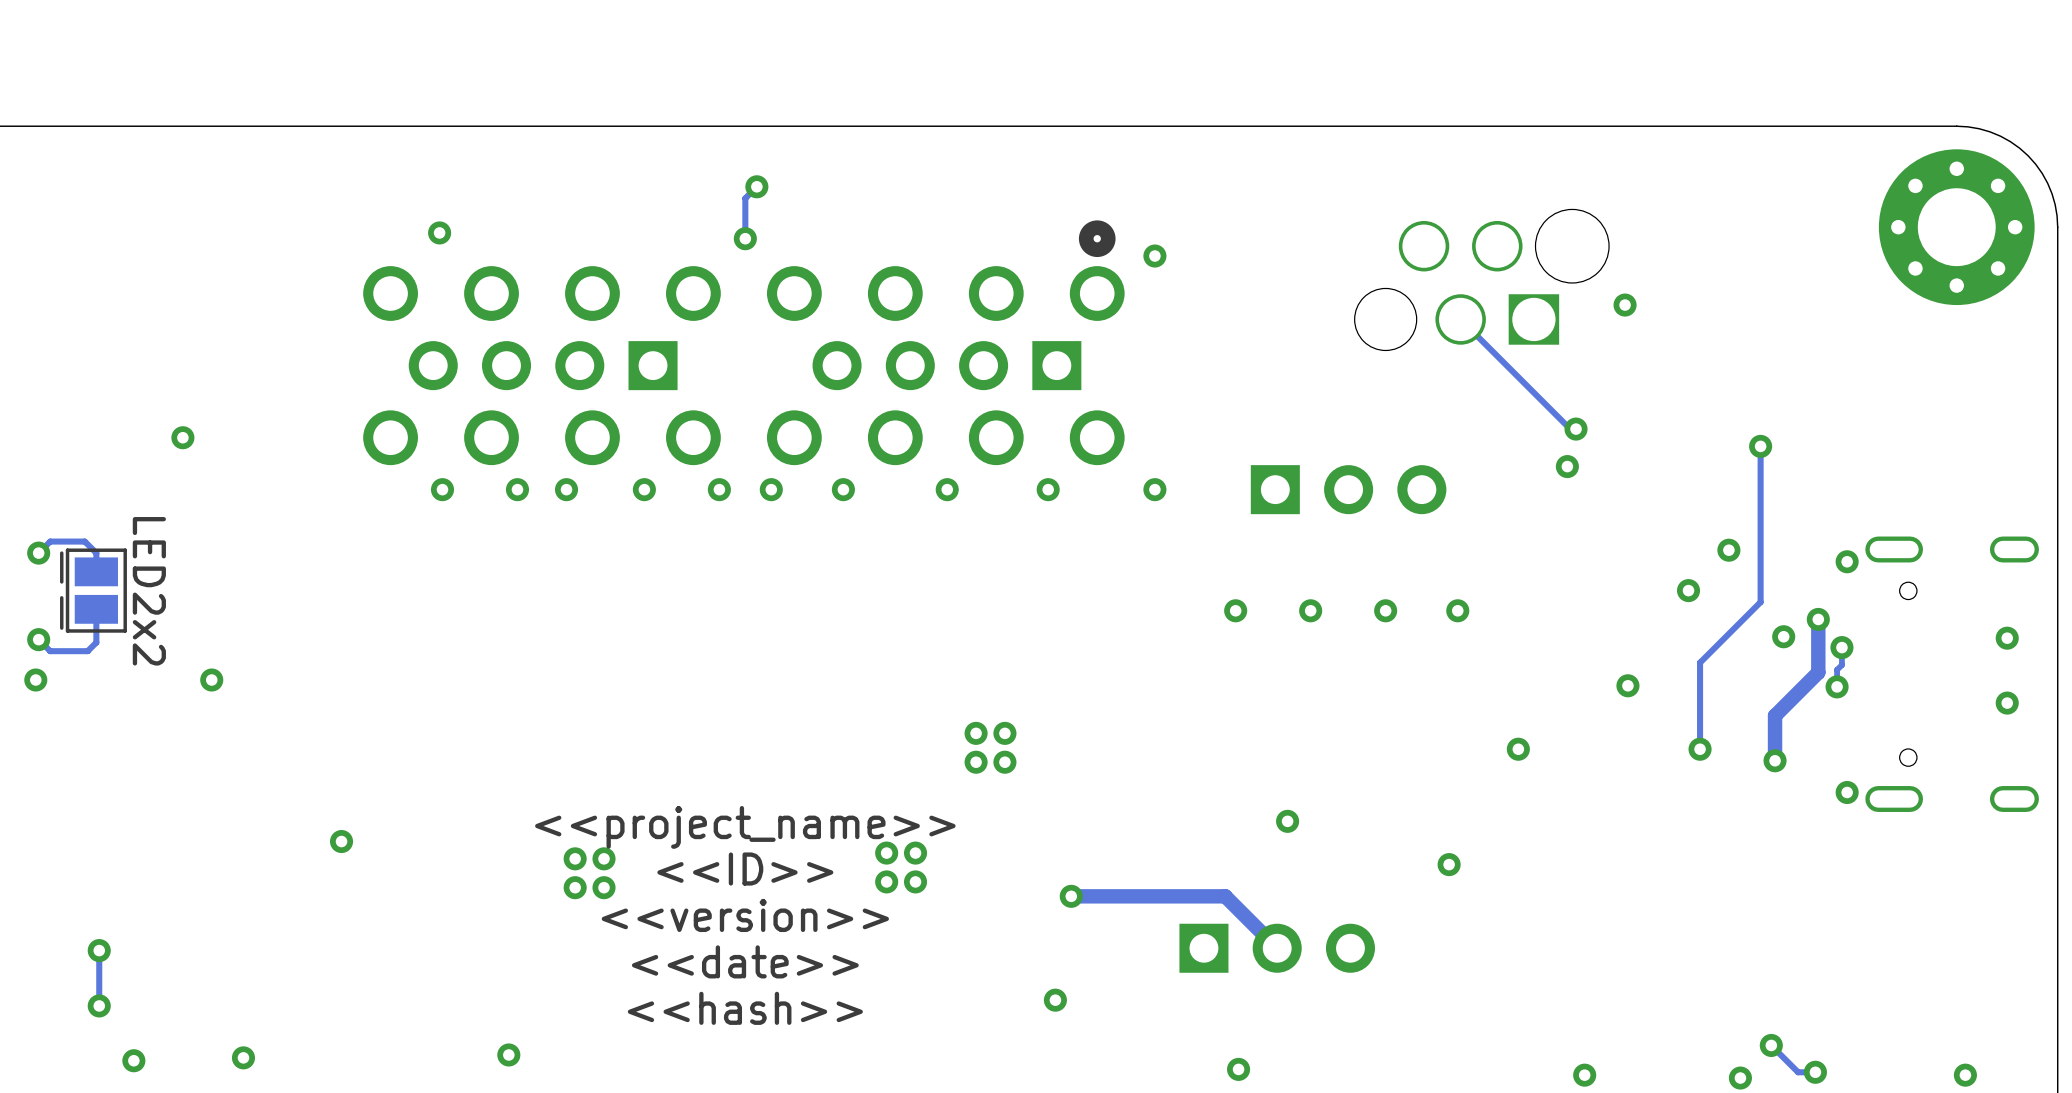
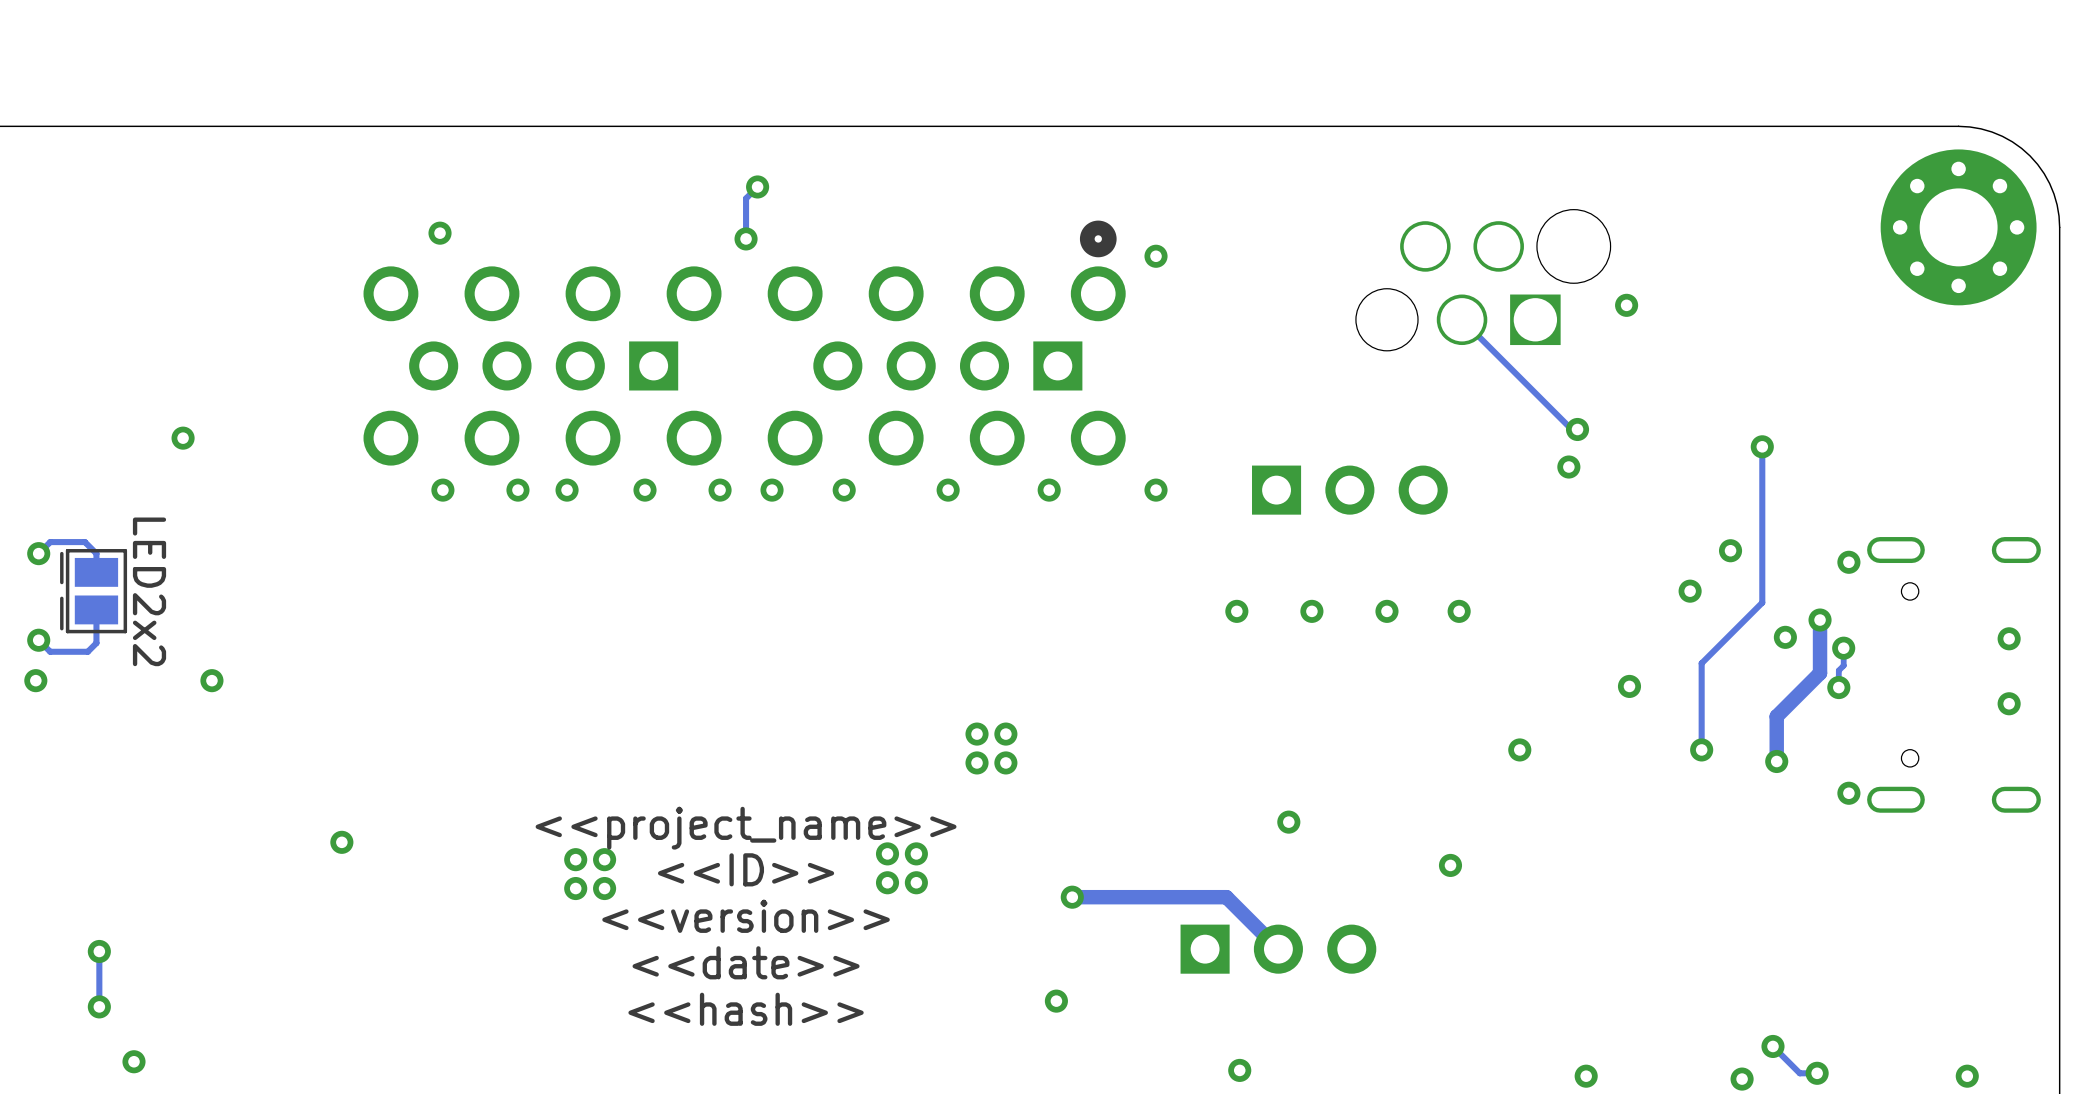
via: (508, 1054) -> none
via: (243, 1057) -> none

